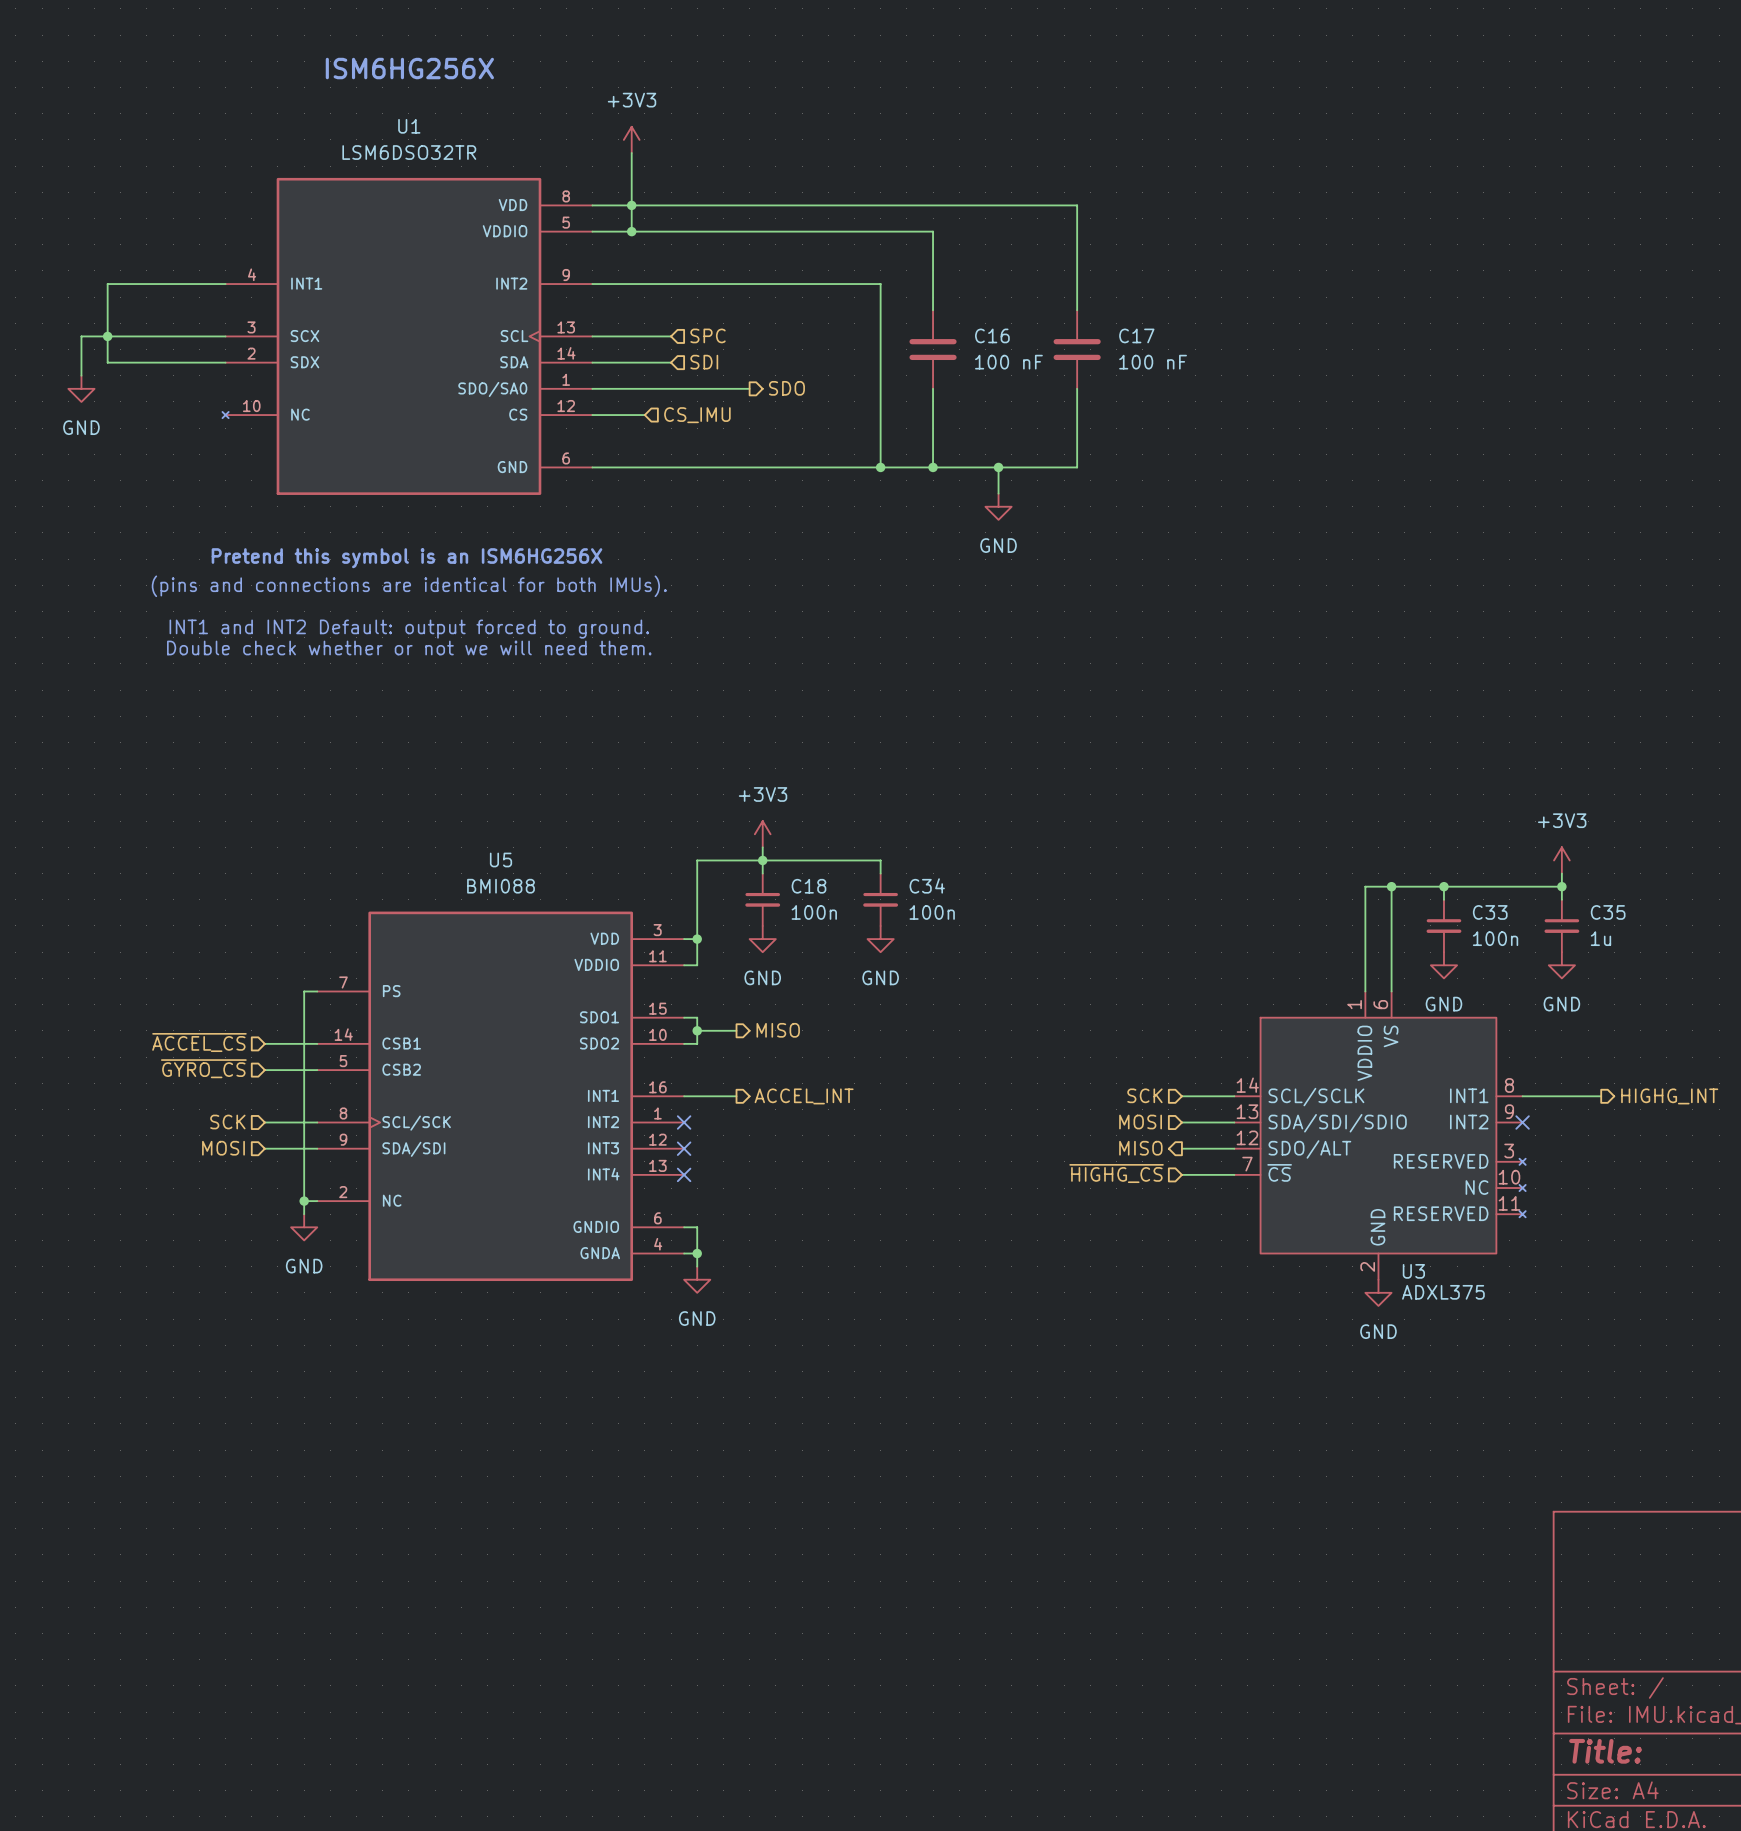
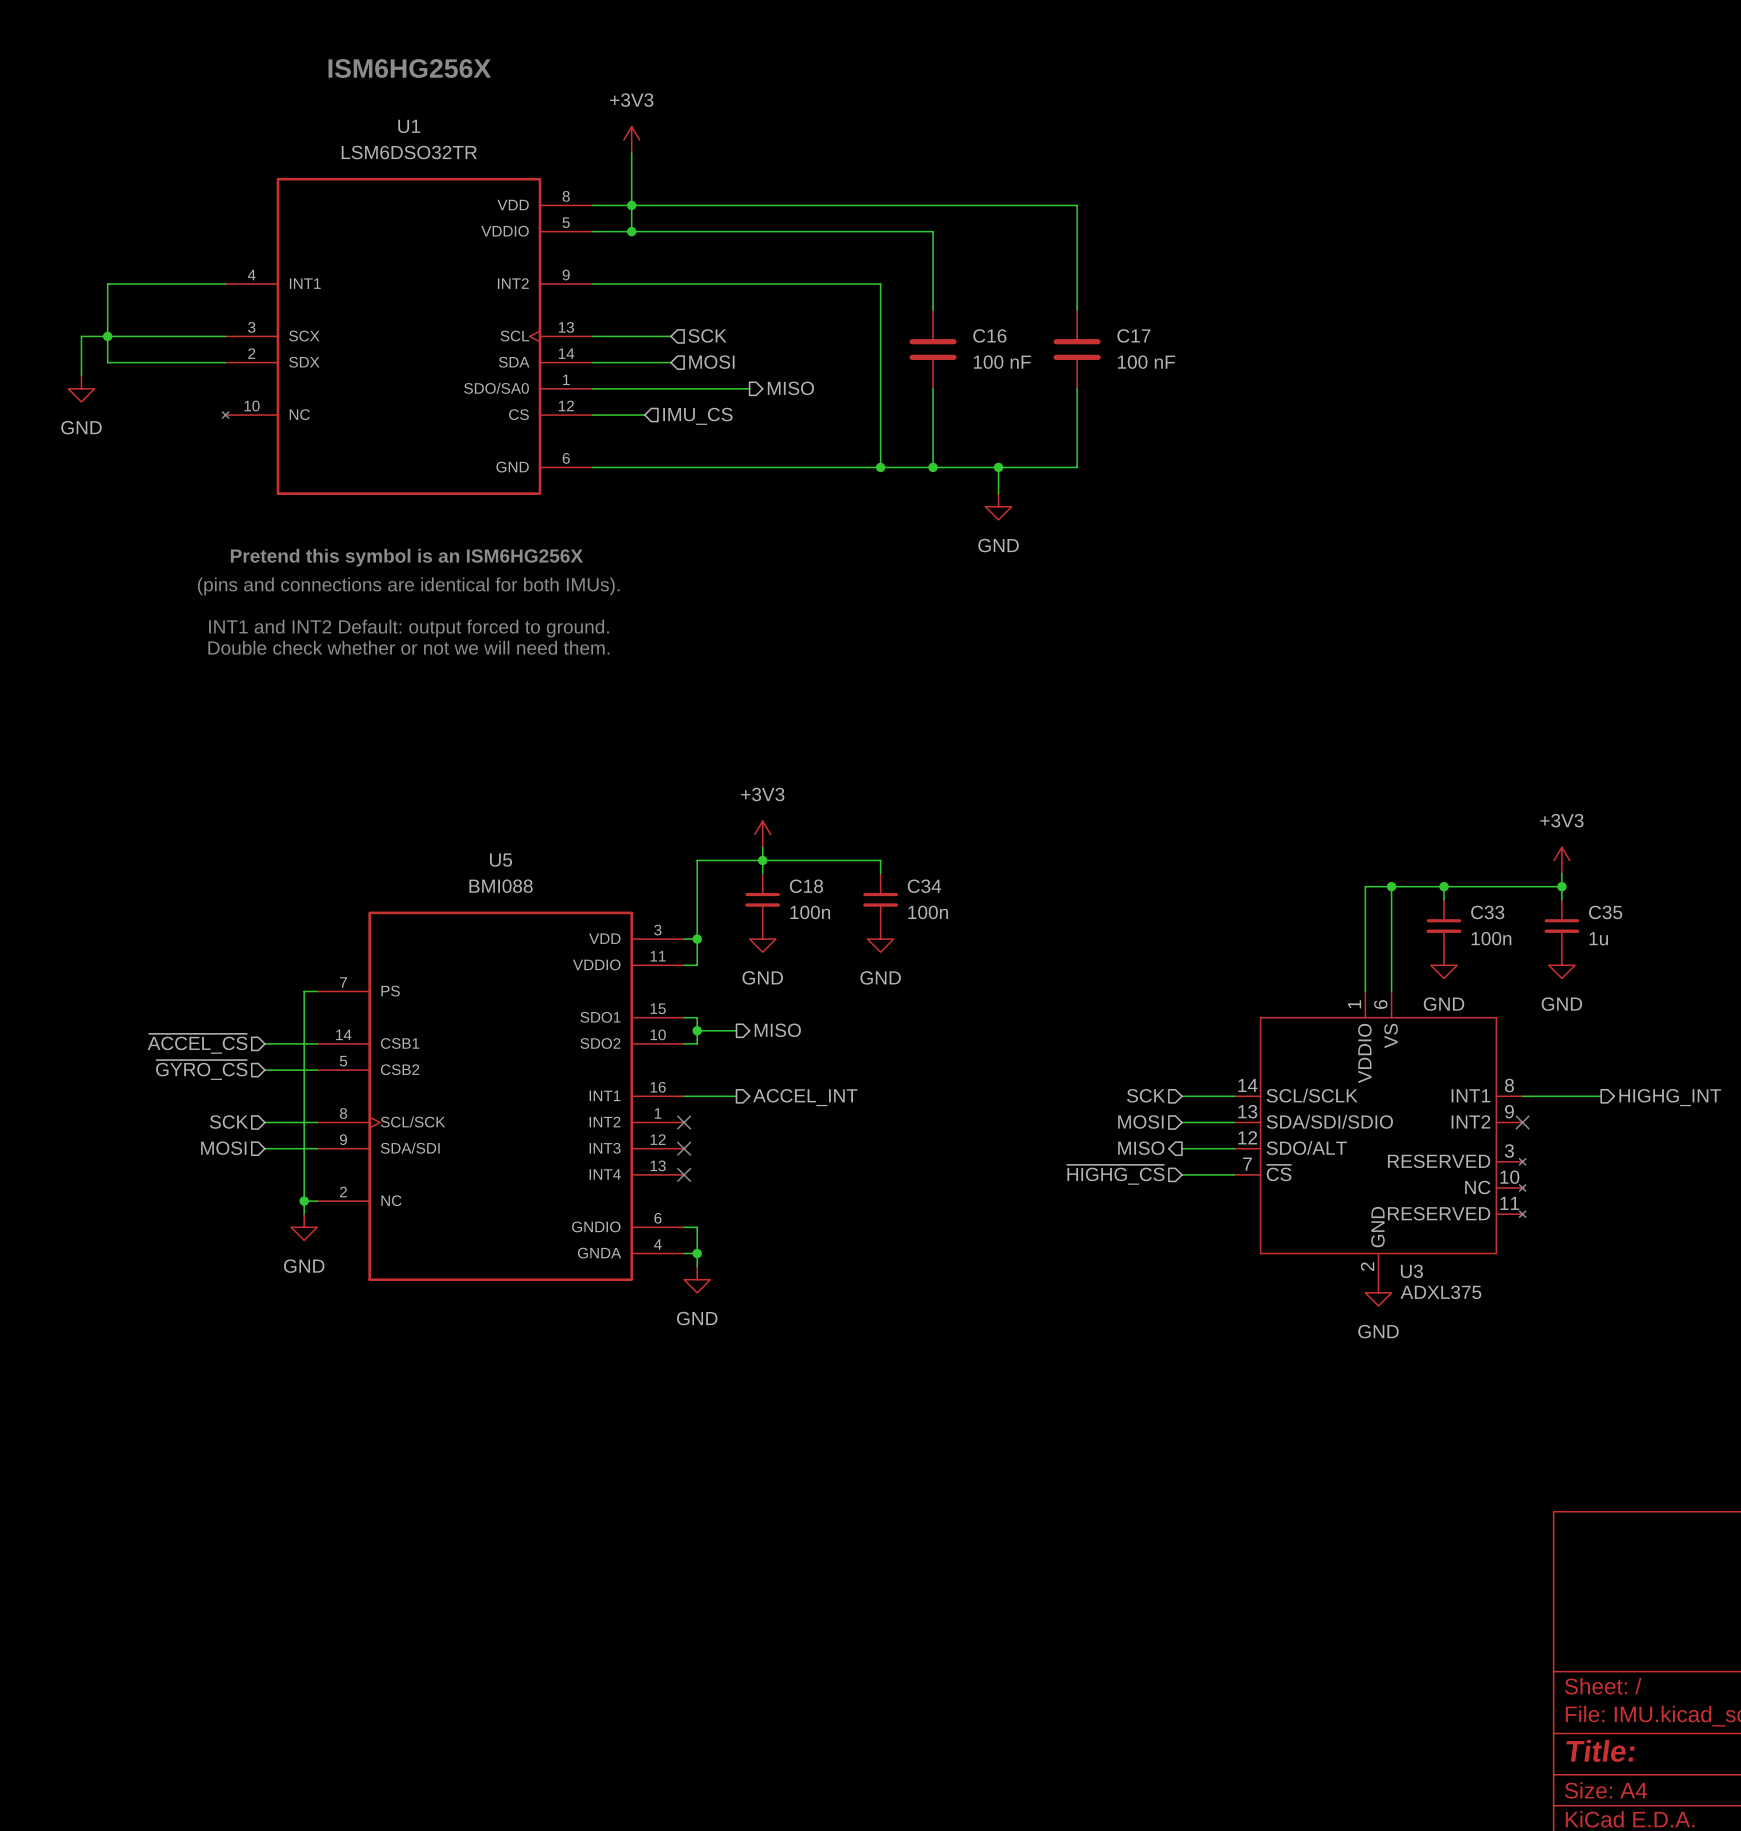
hierarchical label: SPC (708, 335) -> SCK (707, 335)
hierarchical label: SDI (704, 362) -> MOSI (711, 362)
hierarchical label: SDO (786, 388) -> MISO (790, 388)
hierarchical label: CS_IMU (697, 415) -> IMU_CS (697, 416)

